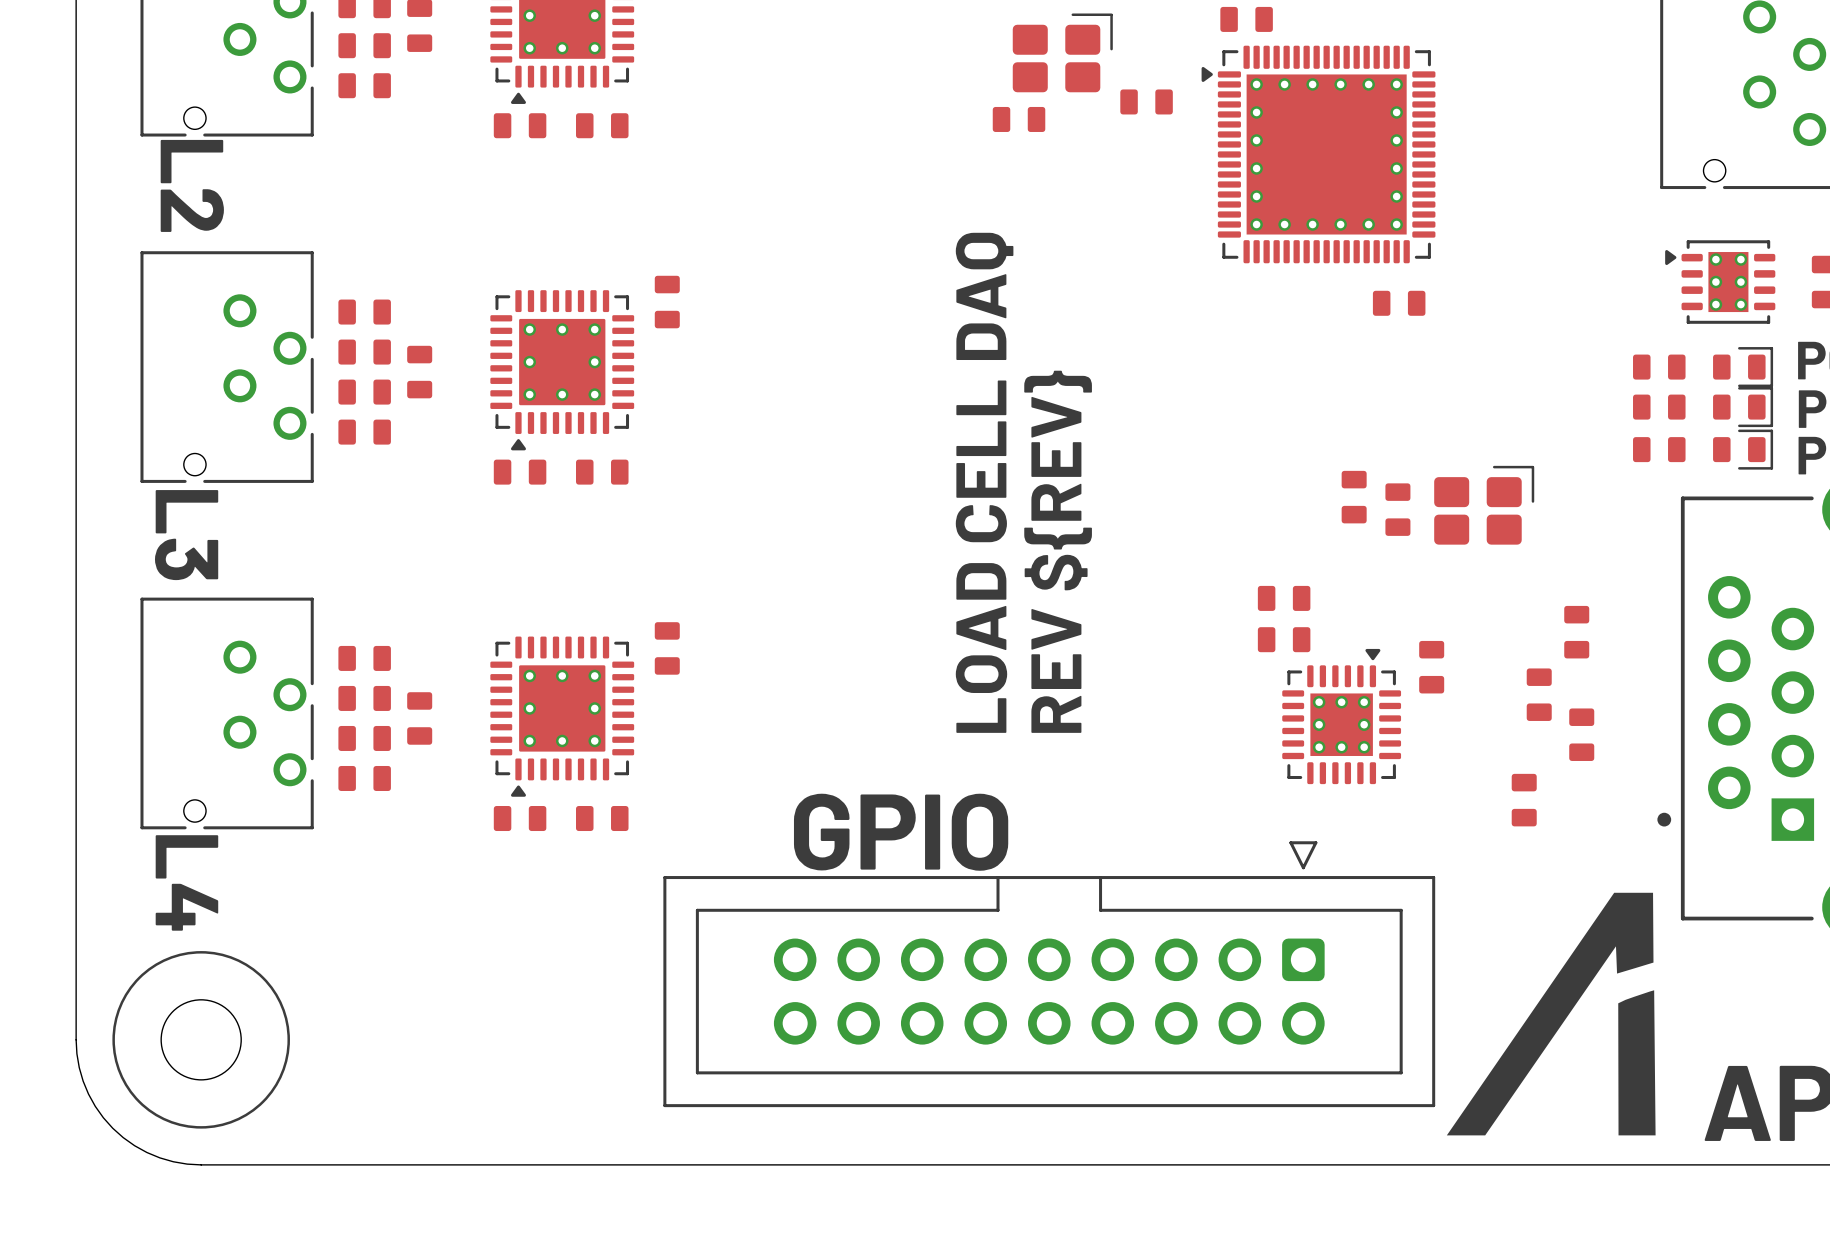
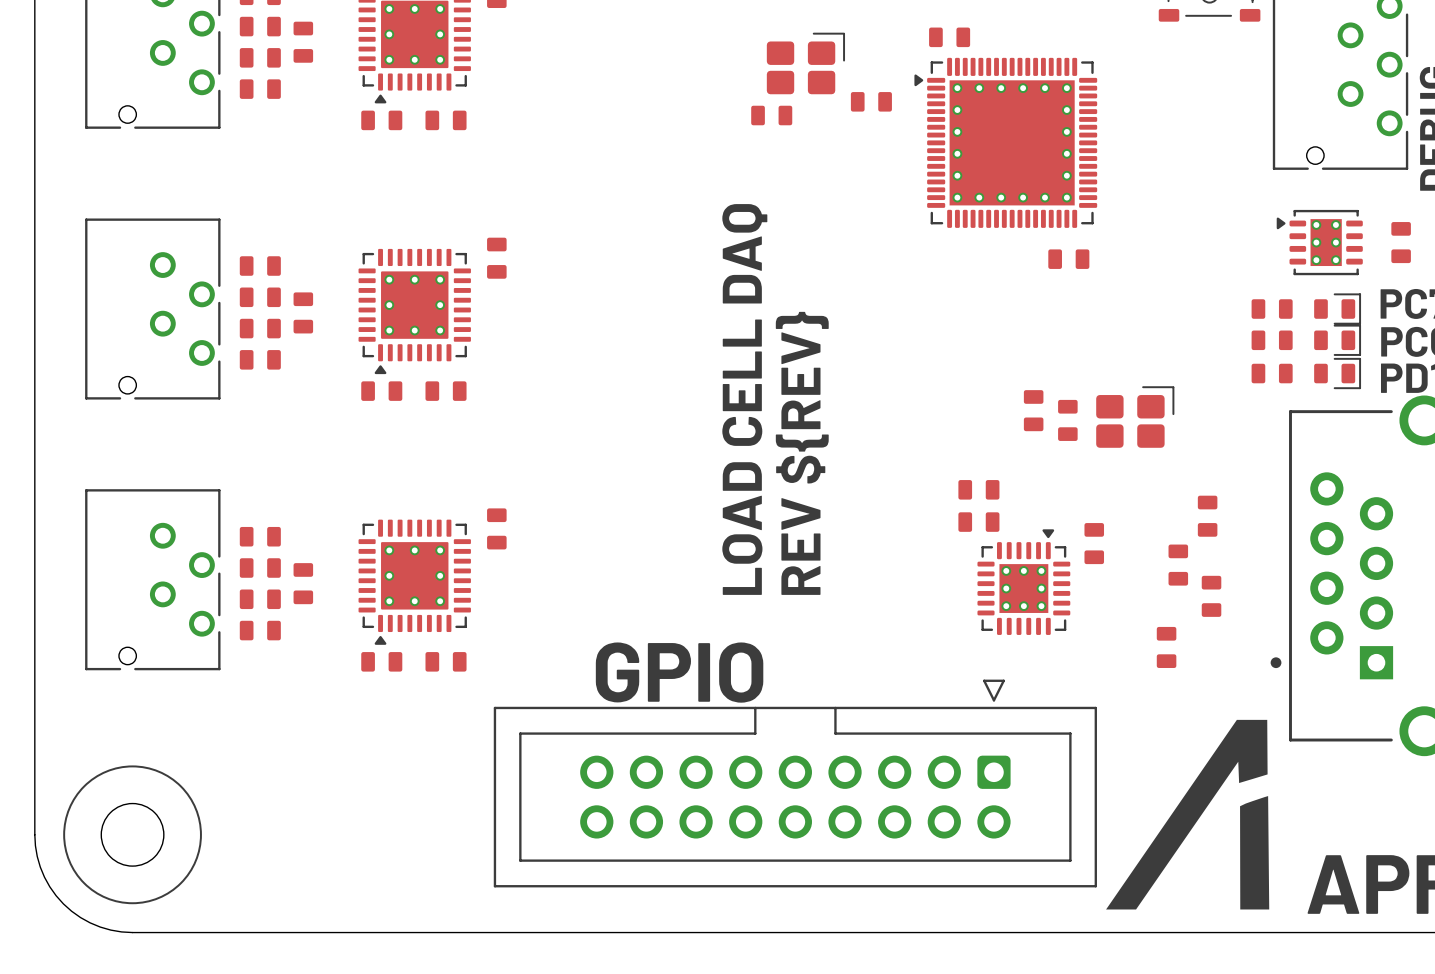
text: L2 (192, 185) -> none
text: L3 (186, 535) -> none
text: L4 (186, 882) -> none

